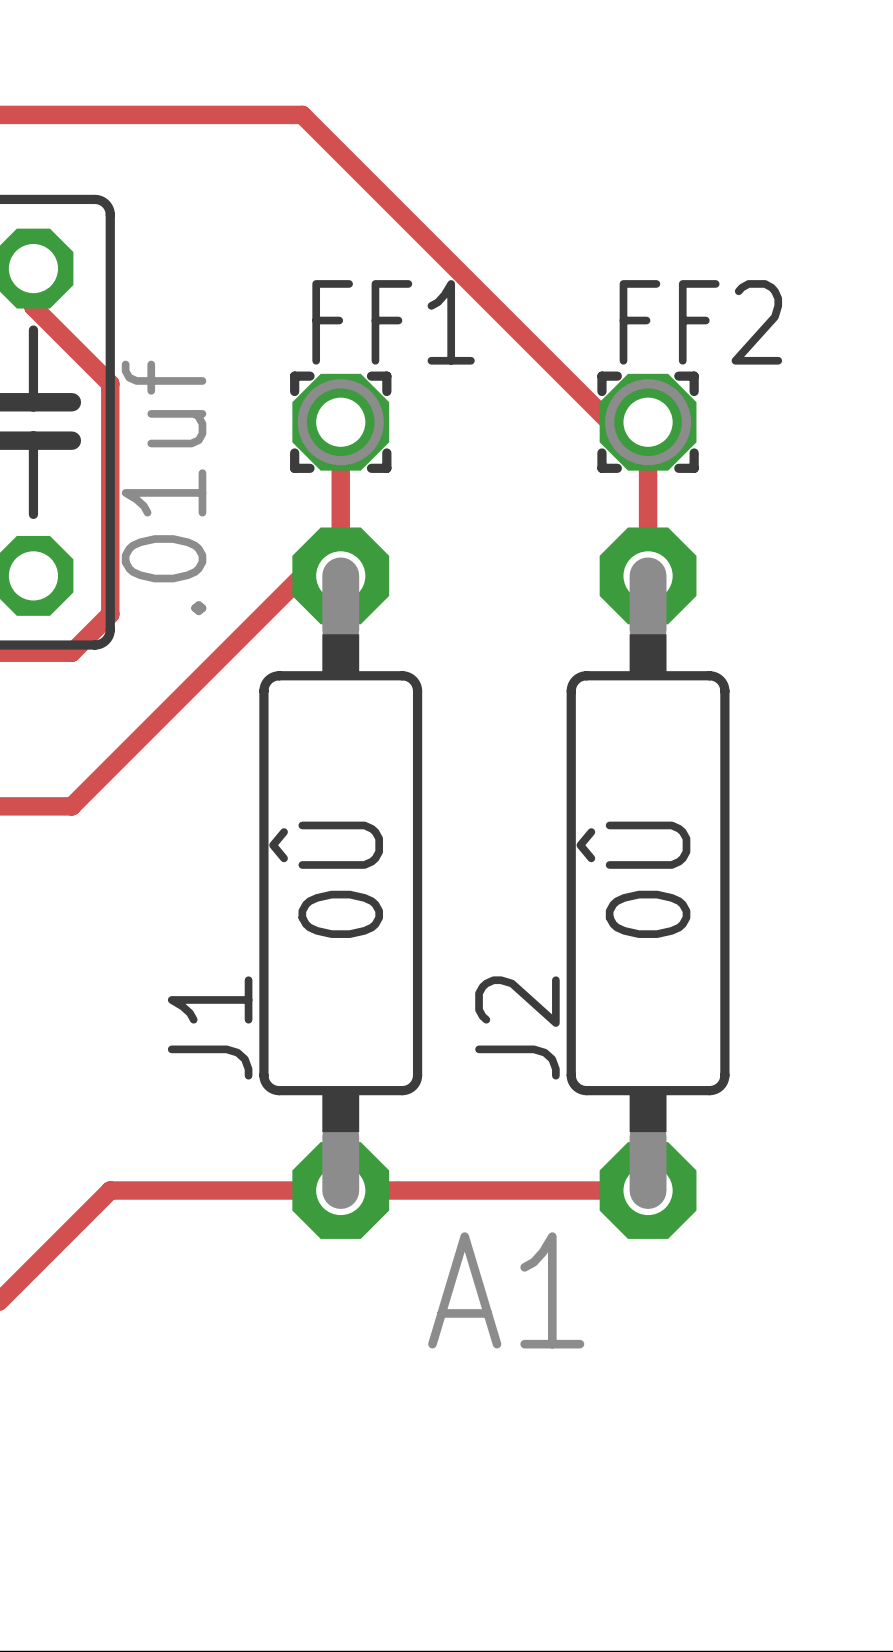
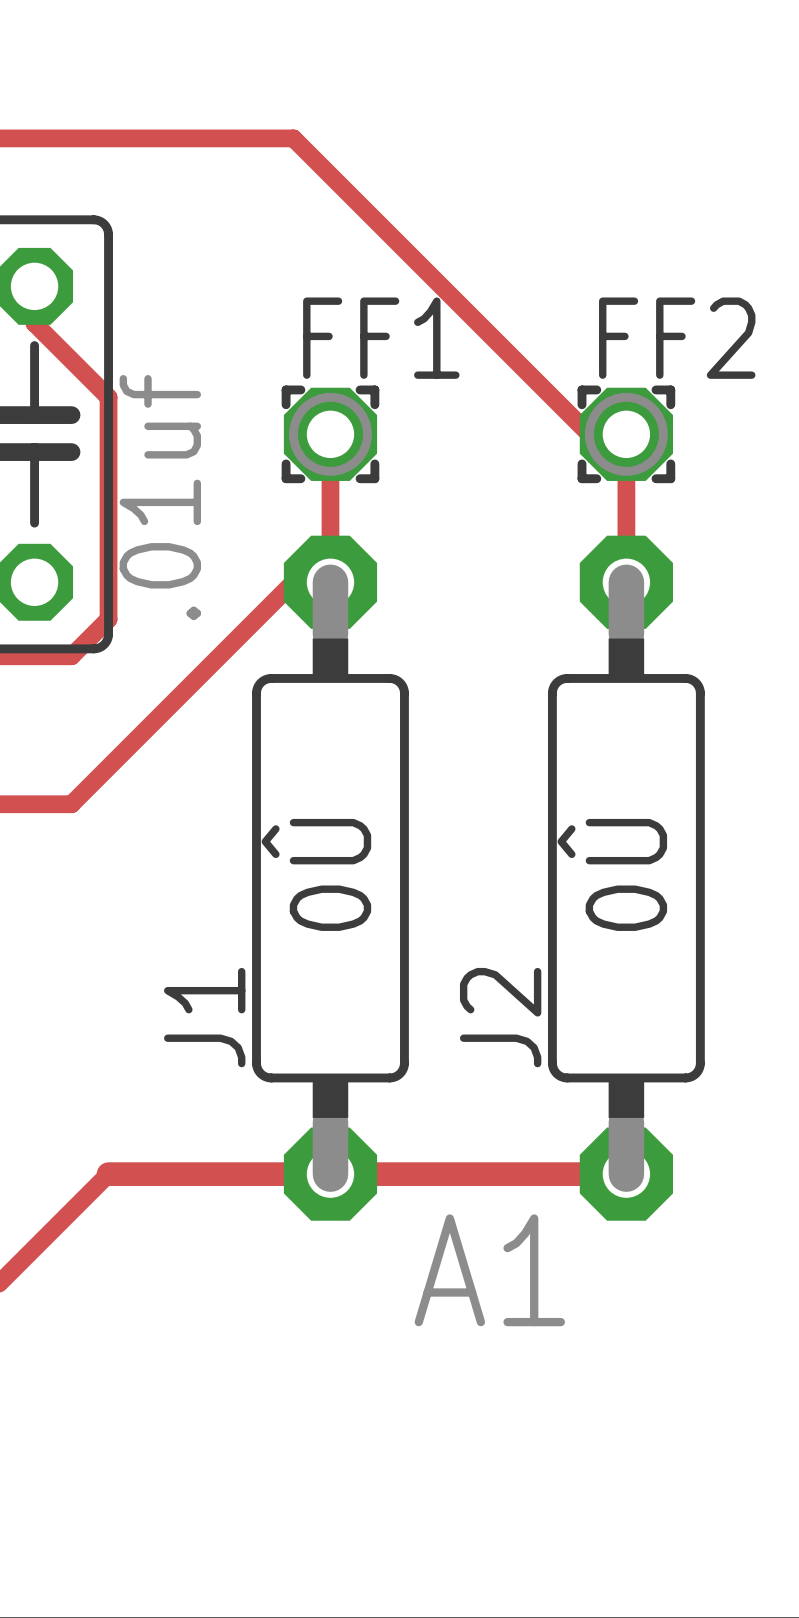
track width: thin (110, 1190) (648, 1190) -> thick (108, 1174) (626, 1174)

